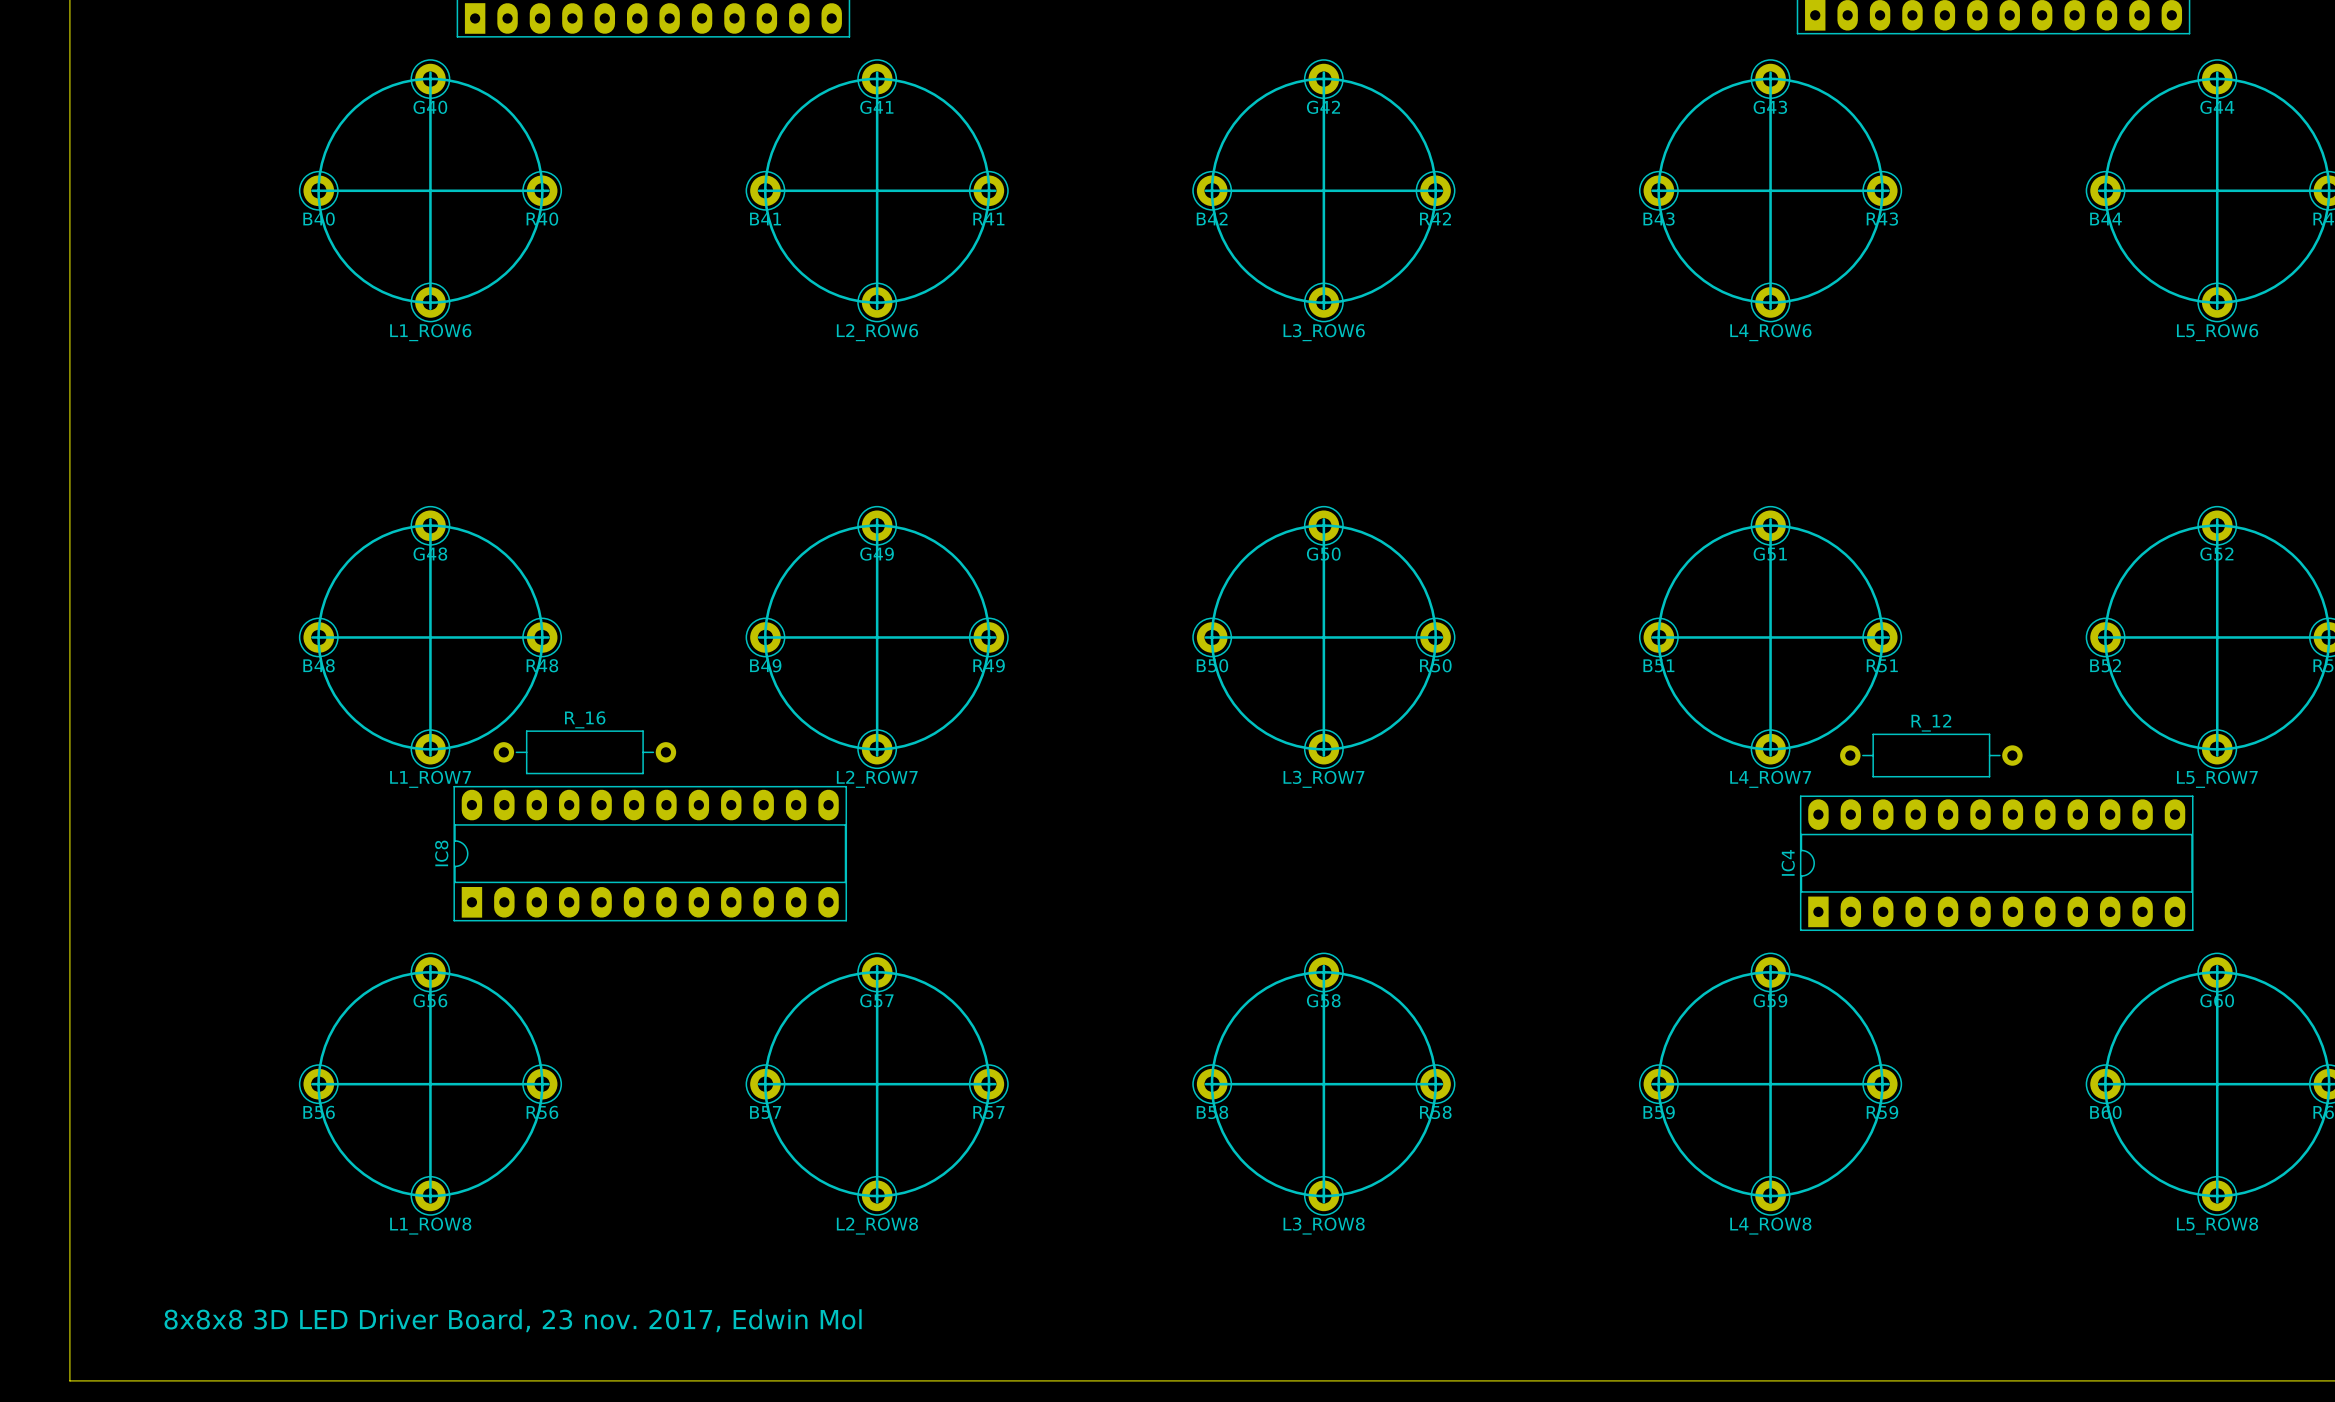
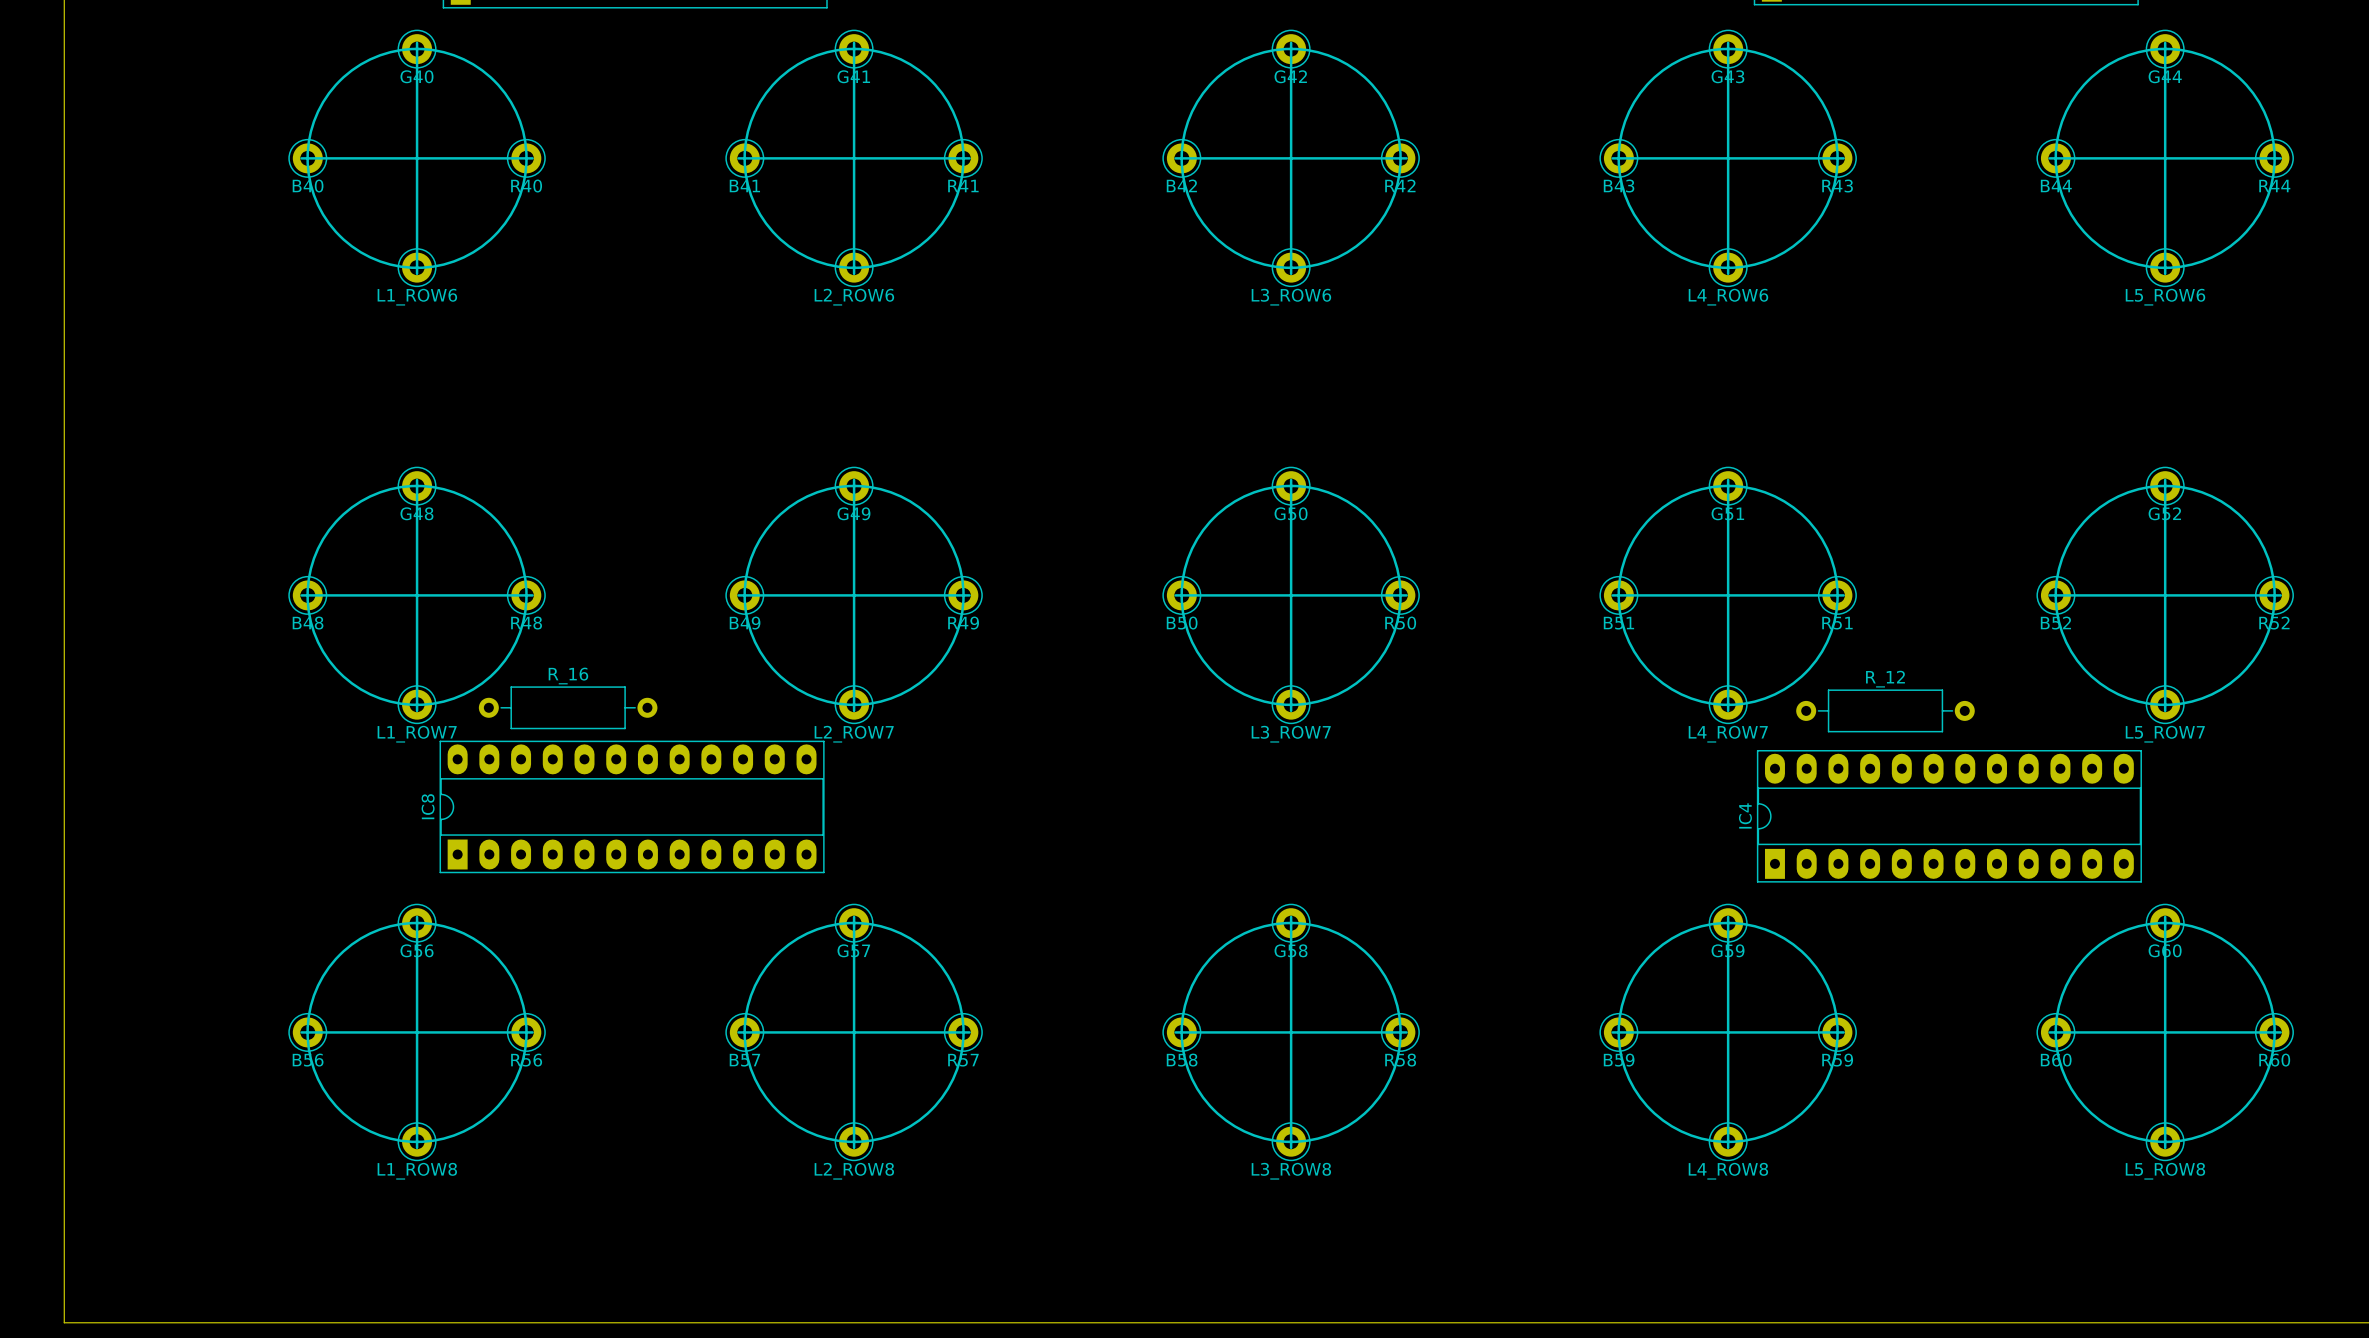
text: 8x8x8 3D LED Driver Board, 23 nov. 2017, Edwin Mol (513, 1320) -> none

